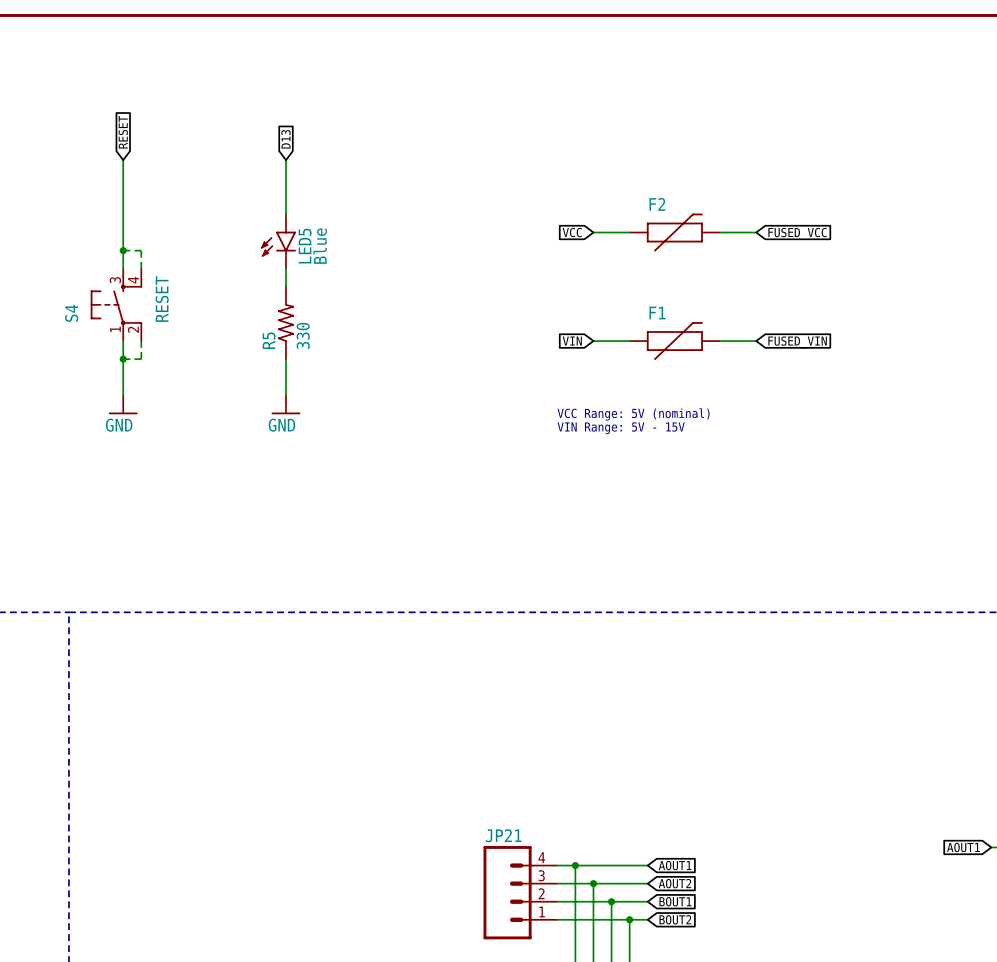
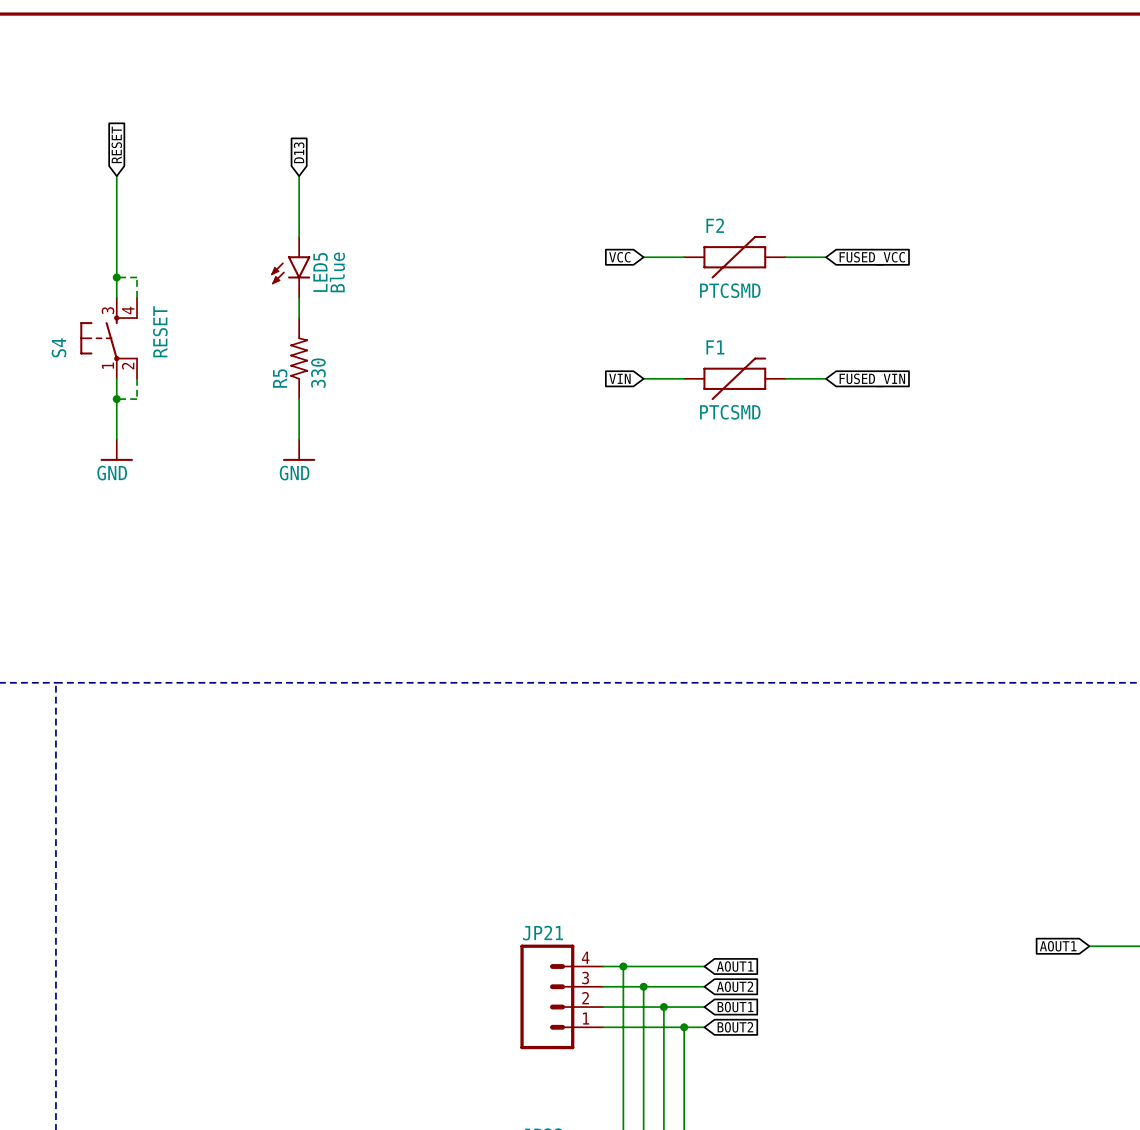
F2 value: none -> PTCSMD (730, 290)
F1 value: none -> PTCSMD (730, 412)
text: VCC Range: 5V (nominal) (633, 414) -> none
text: VIN Range: 5V - 15V (621, 428) -> none

